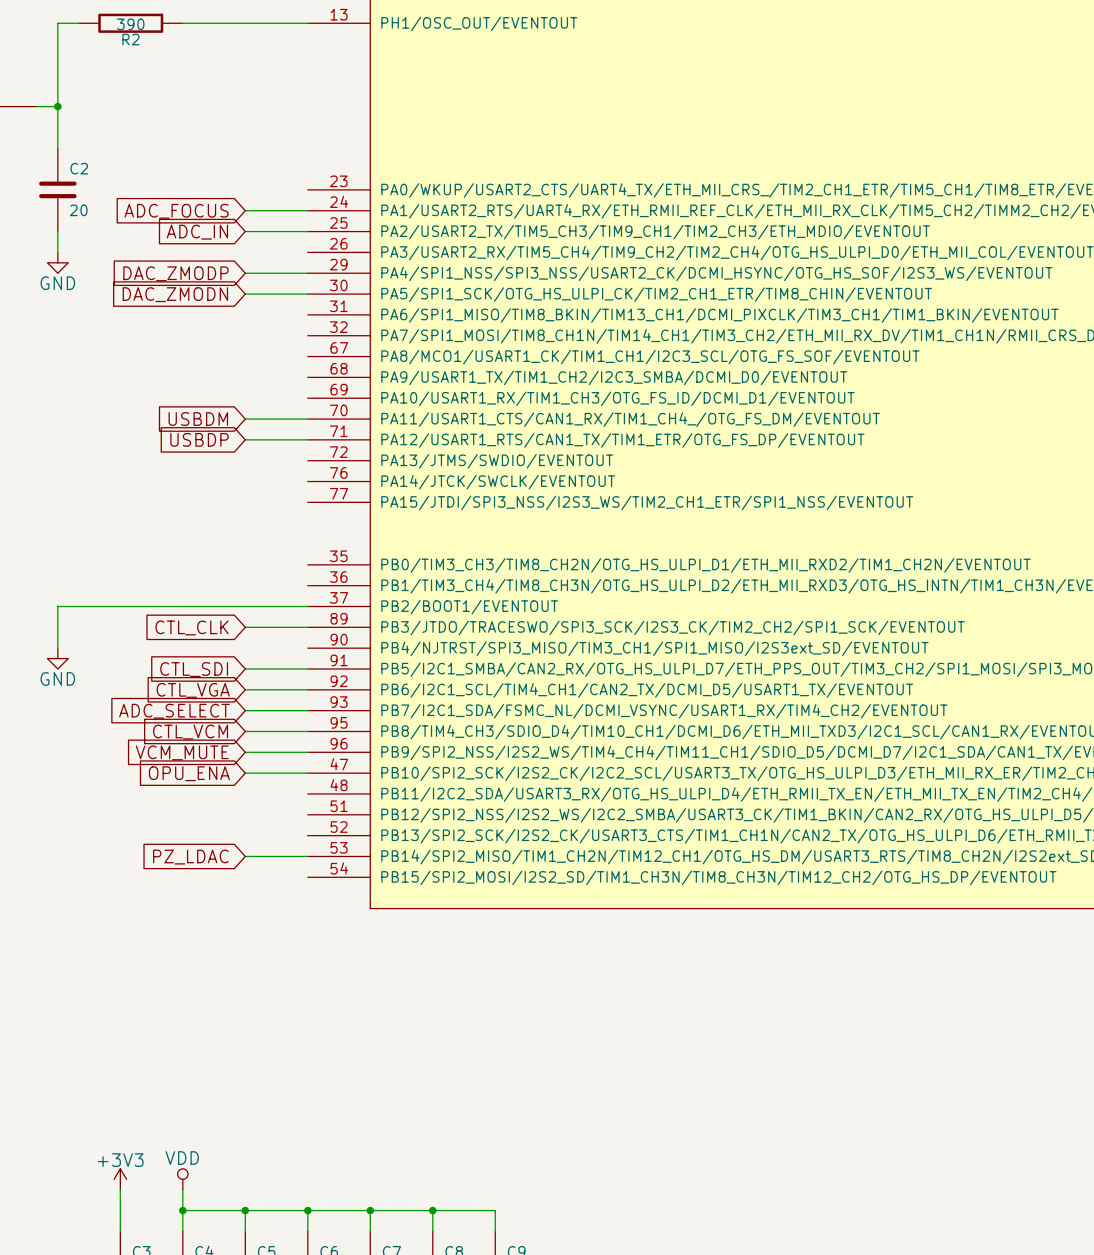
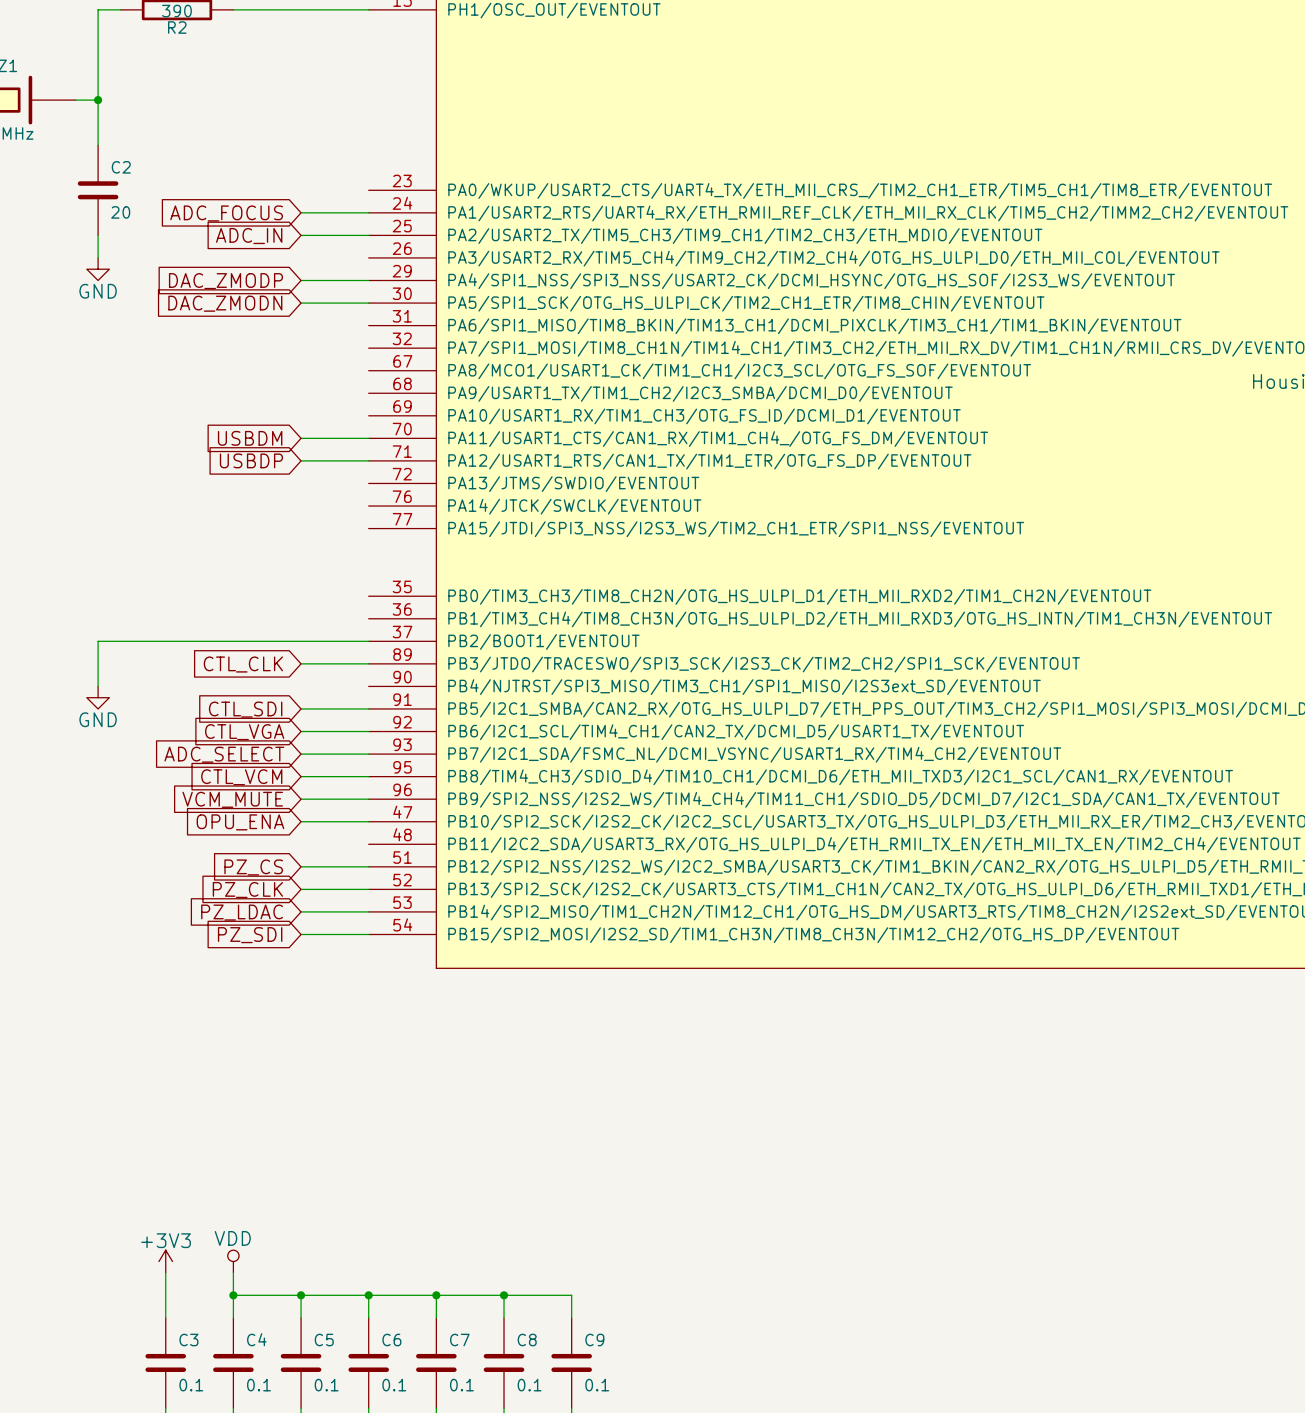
wire: none -> (301, 866) (368, 866)
global label: none -> PZ_CS (253, 867)
wire: none -> (301, 889) (368, 889)
global label: none -> PZ_CLK (247, 890)
global label: none -> PZ_SDI (250, 935)
wire: none -> (301, 934) (368, 934)

